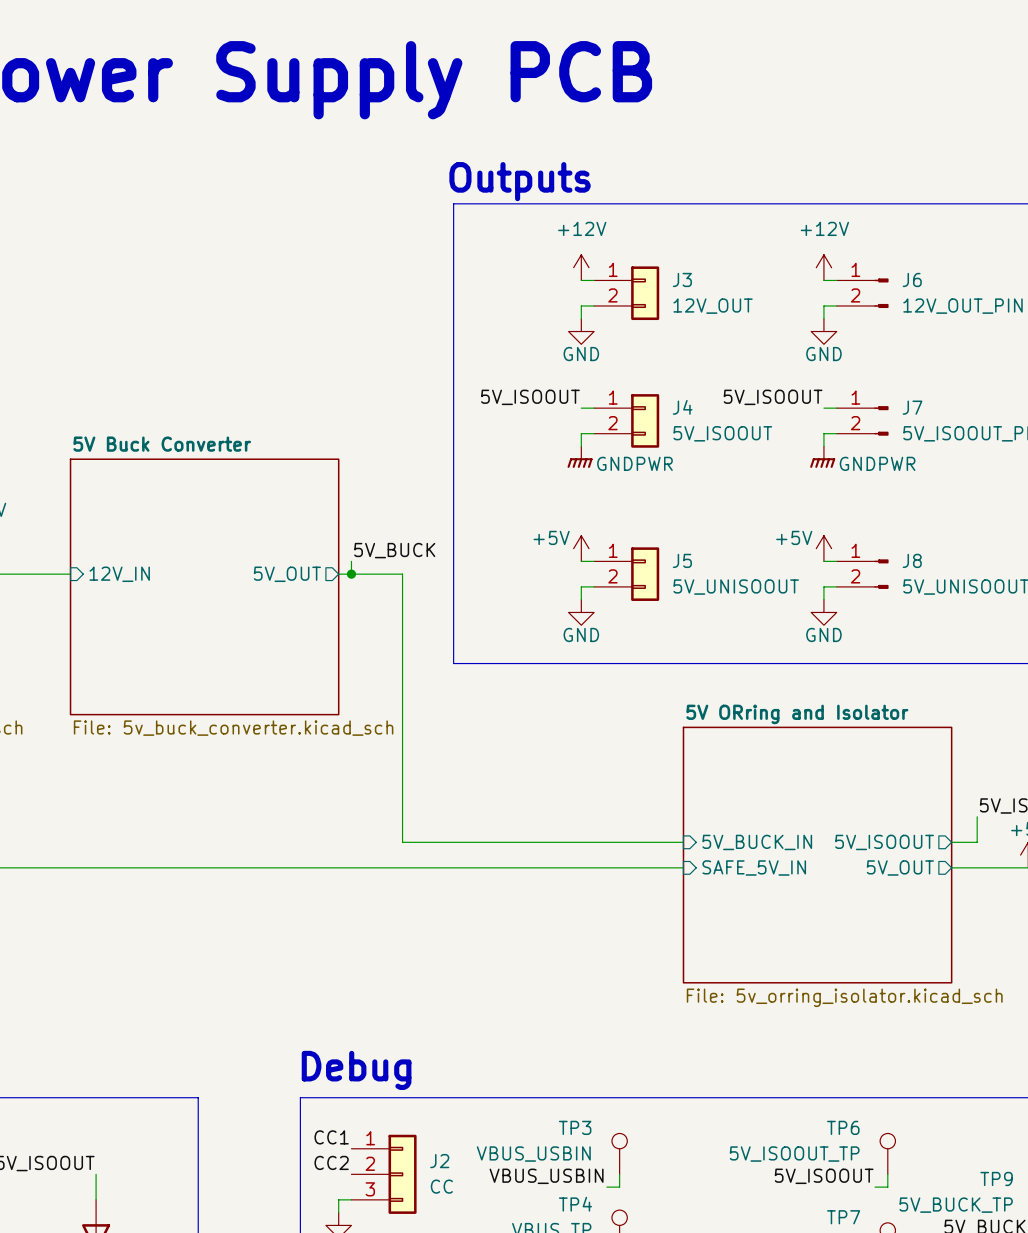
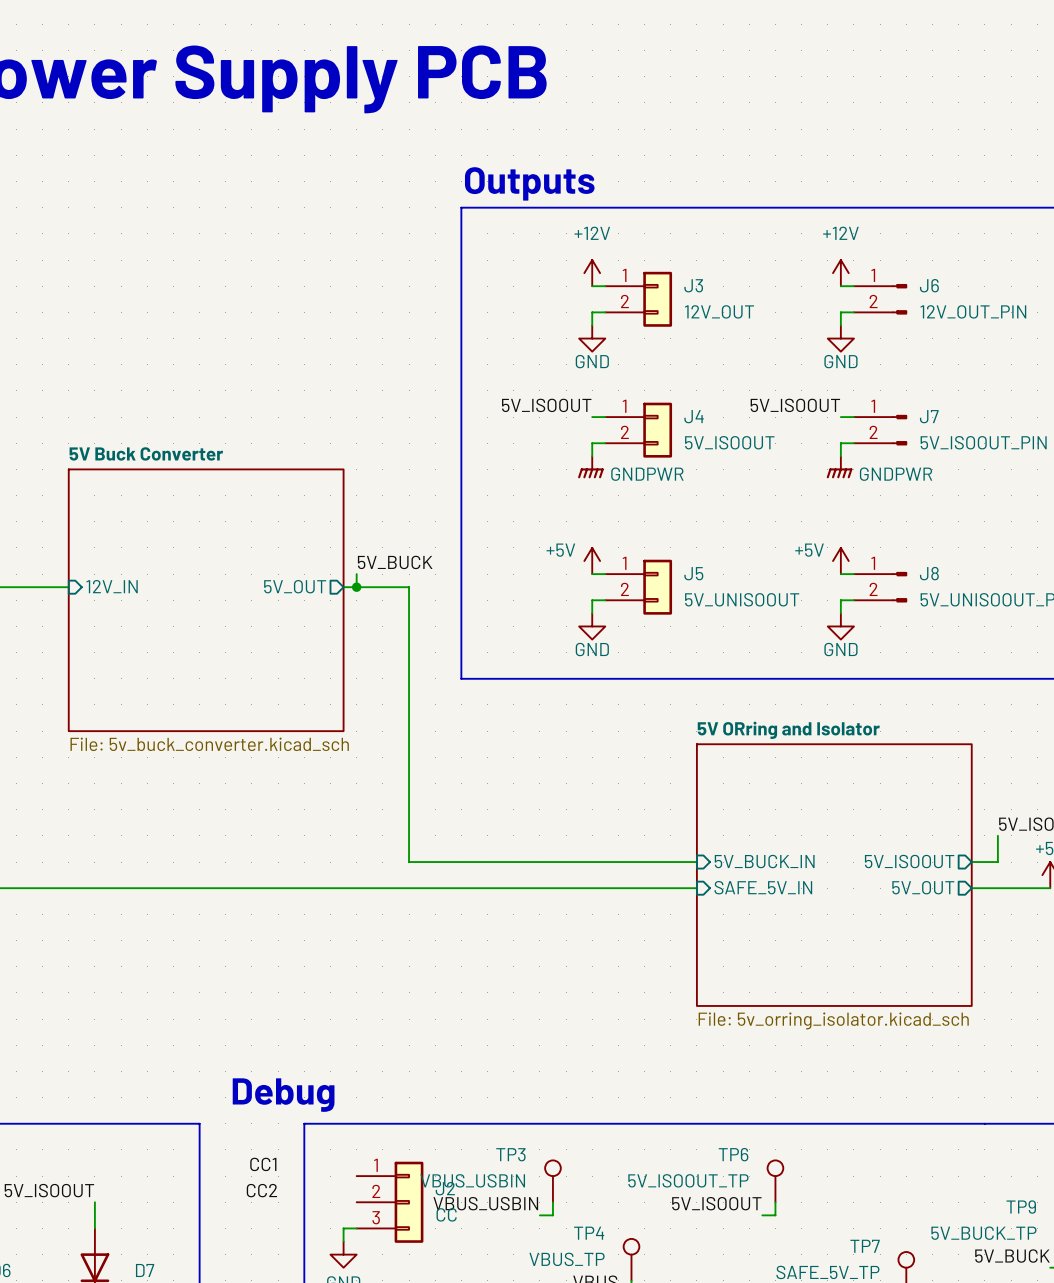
text position: Debug (356, 1070) -> Debug (283, 1095)
label position: CC1 (331, 1137) -> CC1 (263, 1164)
TP3 position: (619, 1153) -> (552, 1181)
TP6 position: (887, 1153) -> (775, 1181)
label position: CC2 (331, 1162) -> CC2 (261, 1190)
wire: (619, 1174) (619, 1187) (606, 1187) -> (552, 1202) (552, 1215) (539, 1215)
wire: (887, 1174) (887, 1187) (875, 1187) -> (775, 1202) (775, 1215) (762, 1215)
label position: VBUS_USBIN (546, 1176) -> VBUS_USBIN (485, 1203)
label position: 5V_ISOOUT (824, 1176) -> 5V_ISOOUT (716, 1203)

